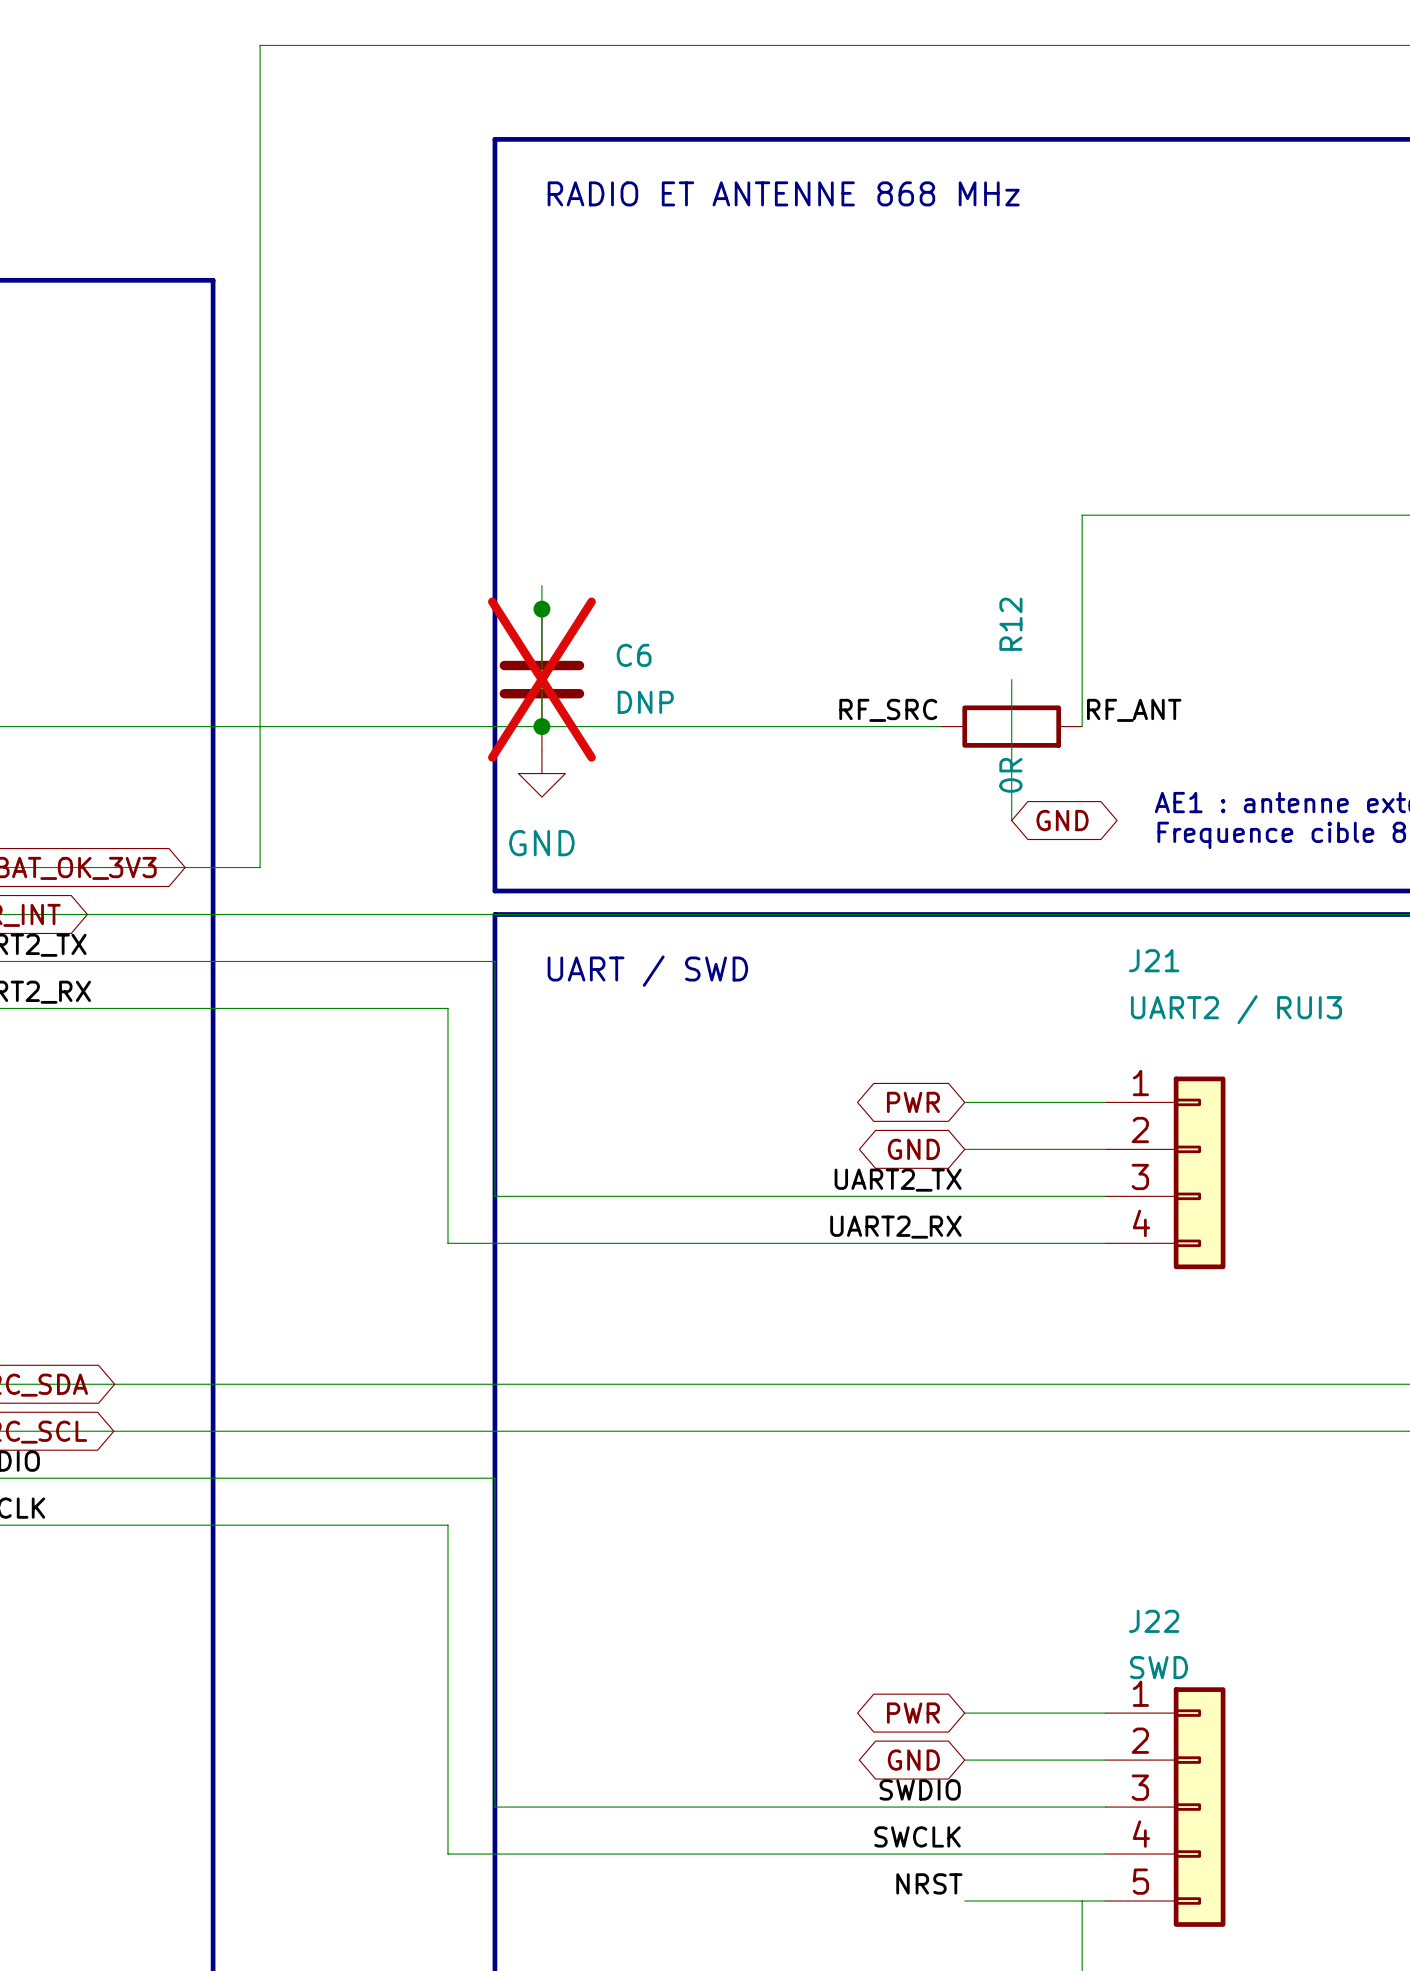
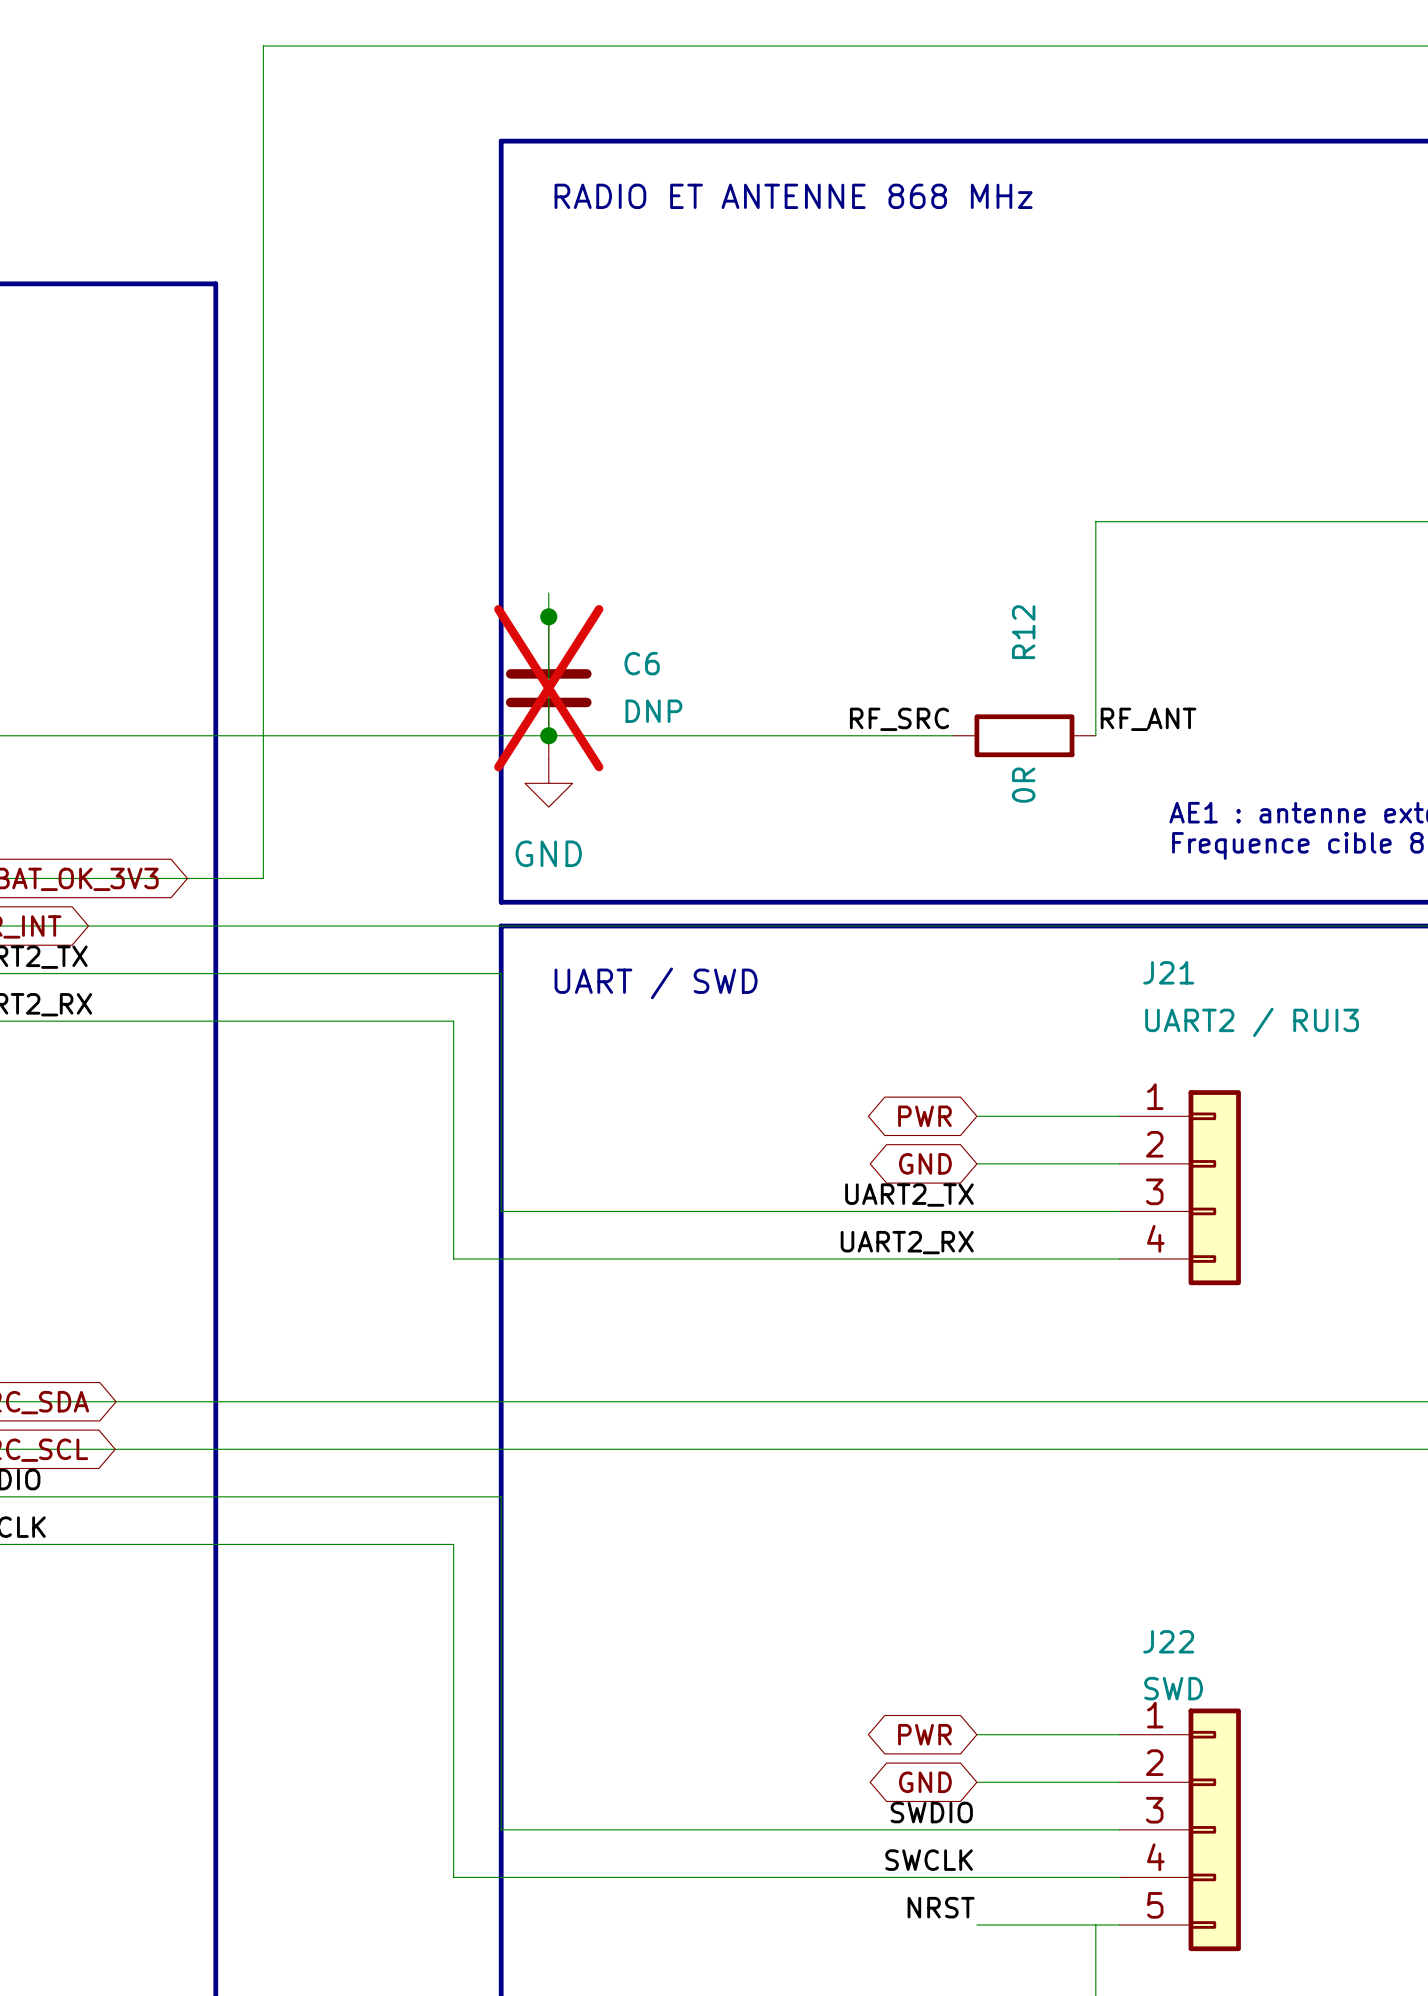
wire: (1011, 679) (1011, 820) -> none
global label: GND (1062, 820) -> none

